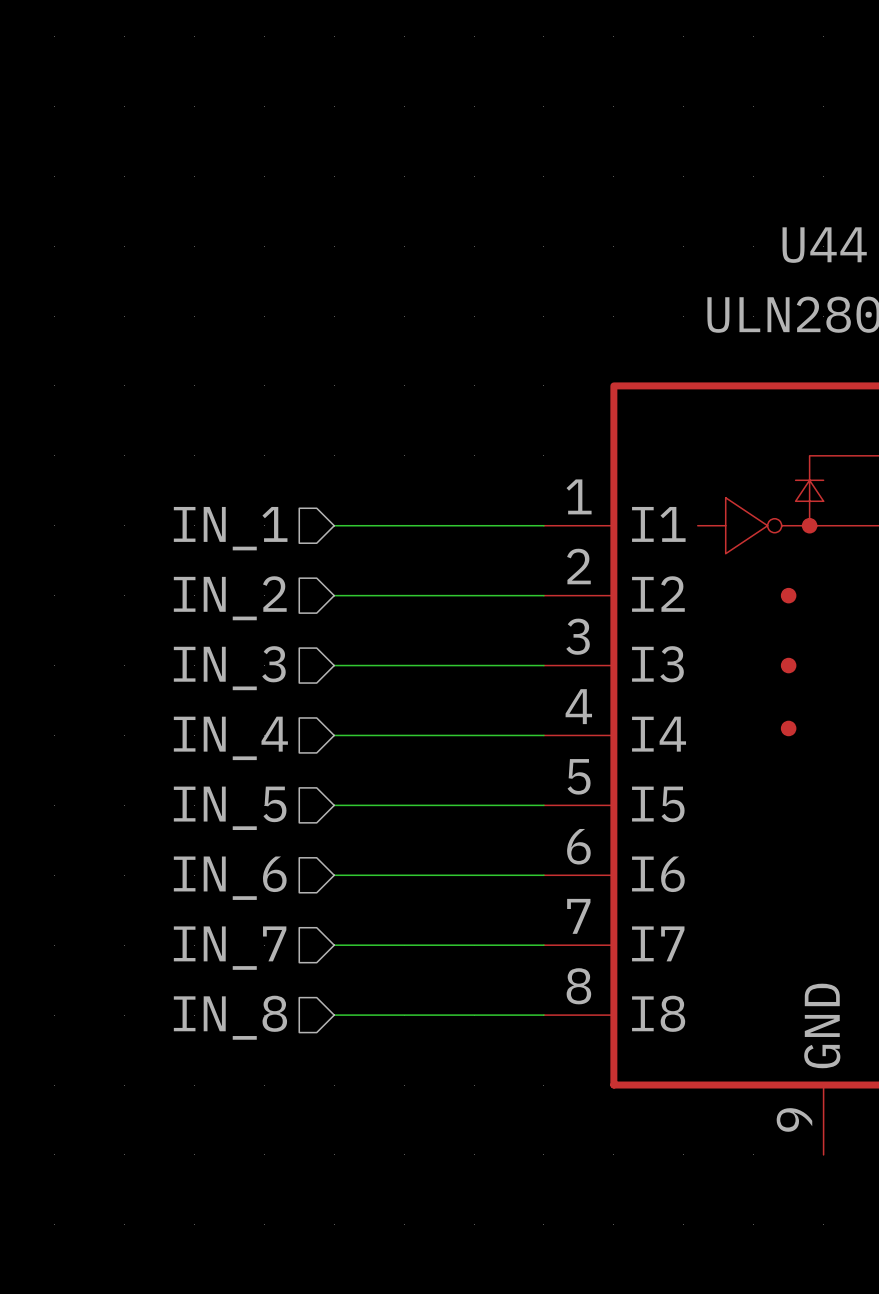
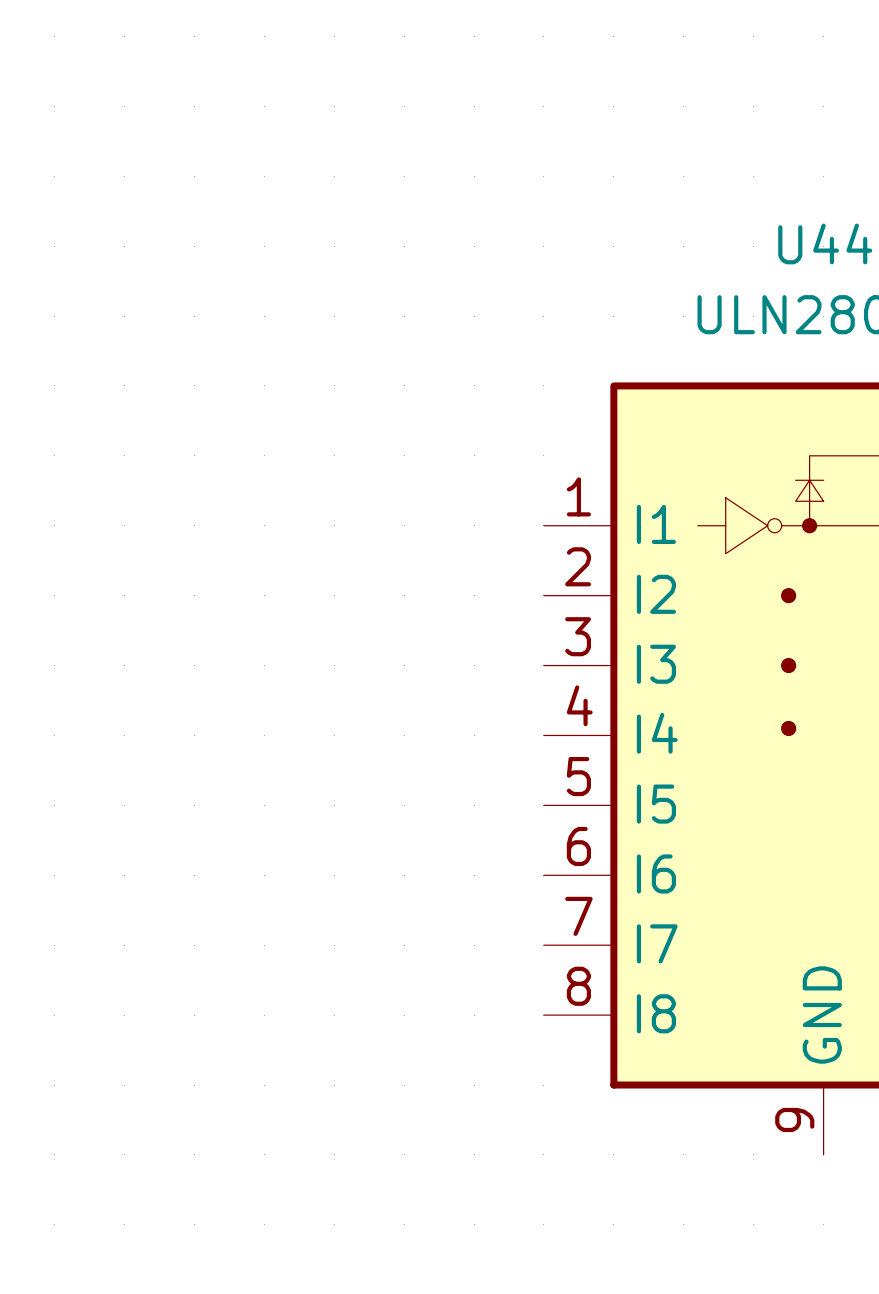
wire: (334, 525) (543, 525) -> none
hierarchical label: IN_1 (230, 528) -> none
wire: (334, 595) (543, 595) -> none
hierarchical label: IN_2 (230, 598) -> none
wire: (334, 665) (543, 665) -> none
hierarchical label: IN_3 (229, 668) -> none
wire: (334, 735) (543, 735) -> none
hierarchical label: IN_4 (230, 738) -> none
wire: (334, 805) (543, 805) -> none
hierarchical label: IN_5 (230, 808) -> none
wire: (334, 875) (543, 875) -> none
hierarchical label: IN_6 (230, 878) -> none
wire: (334, 945) (543, 945) -> none
hierarchical label: IN_7 (230, 948) -> none
wire: (334, 1015) (543, 1015) -> none
hierarchical label: IN_8 (230, 1017) -> none

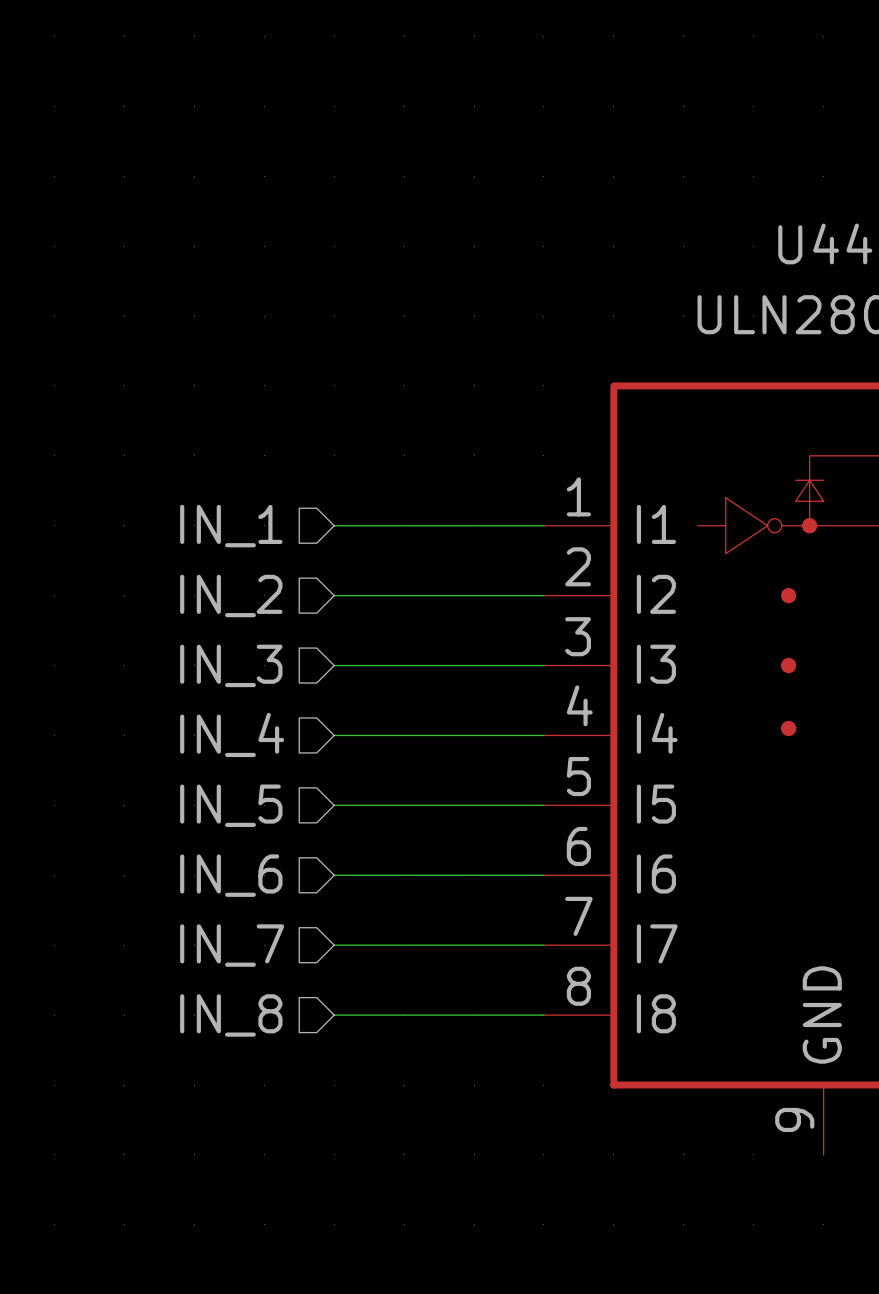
wire: none -> (334, 525) (543, 525)
hierarchical label: none -> IN_1 (231, 526)
wire: none -> (334, 595) (543, 595)
hierarchical label: none -> IN_2 (231, 596)
hierarchical label: none -> IN_3 (231, 665)
wire: none -> (334, 665) (543, 665)
hierarchical label: none -> IN_4 (232, 734)
wire: none -> (334, 735) (543, 735)
hierarchical label: none -> IN_5 (231, 805)
wire: none -> (334, 805) (543, 805)
hierarchical label: none -> IN_6 (231, 875)
wire: none -> (334, 875) (543, 875)
hierarchical label: none -> IN_7 (232, 945)
wire: none -> (334, 945) (543, 945)
hierarchical label: none -> IN_8 (231, 1015)
wire: none -> (334, 1015) (543, 1015)

